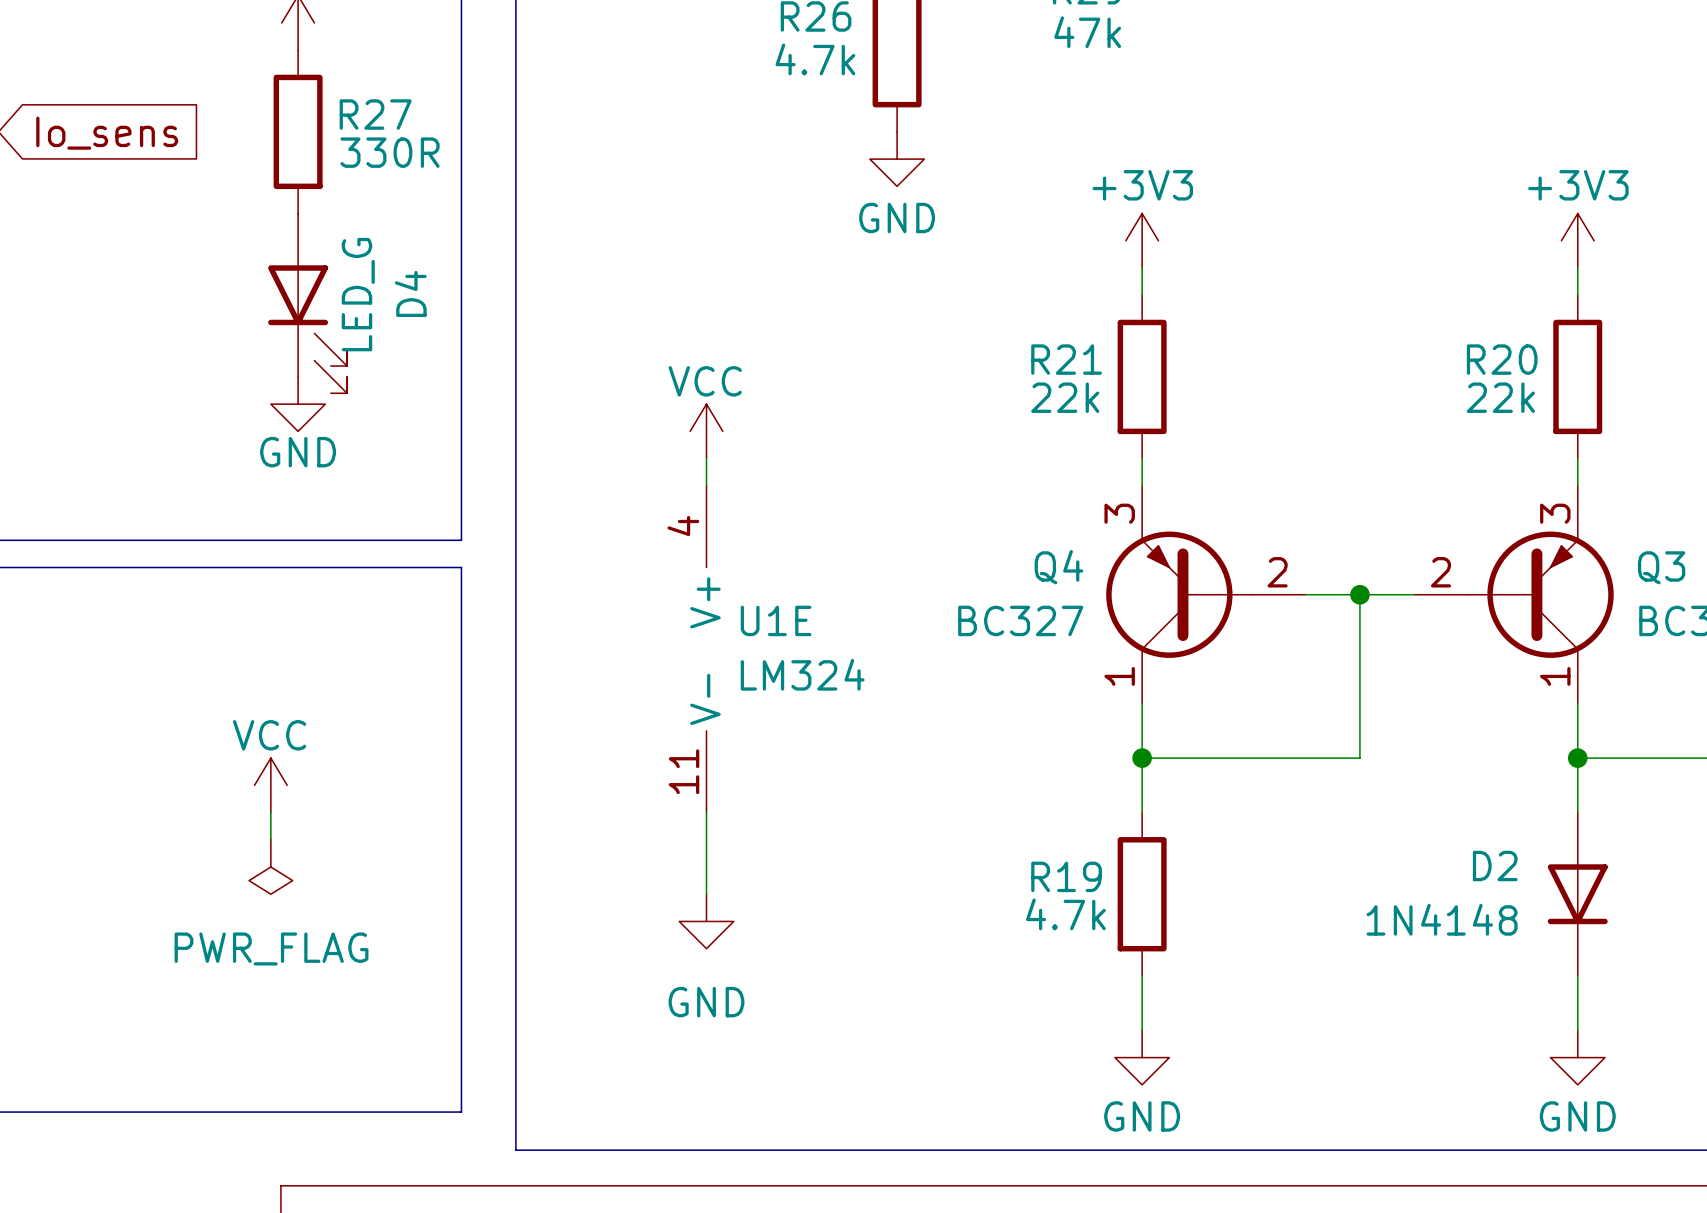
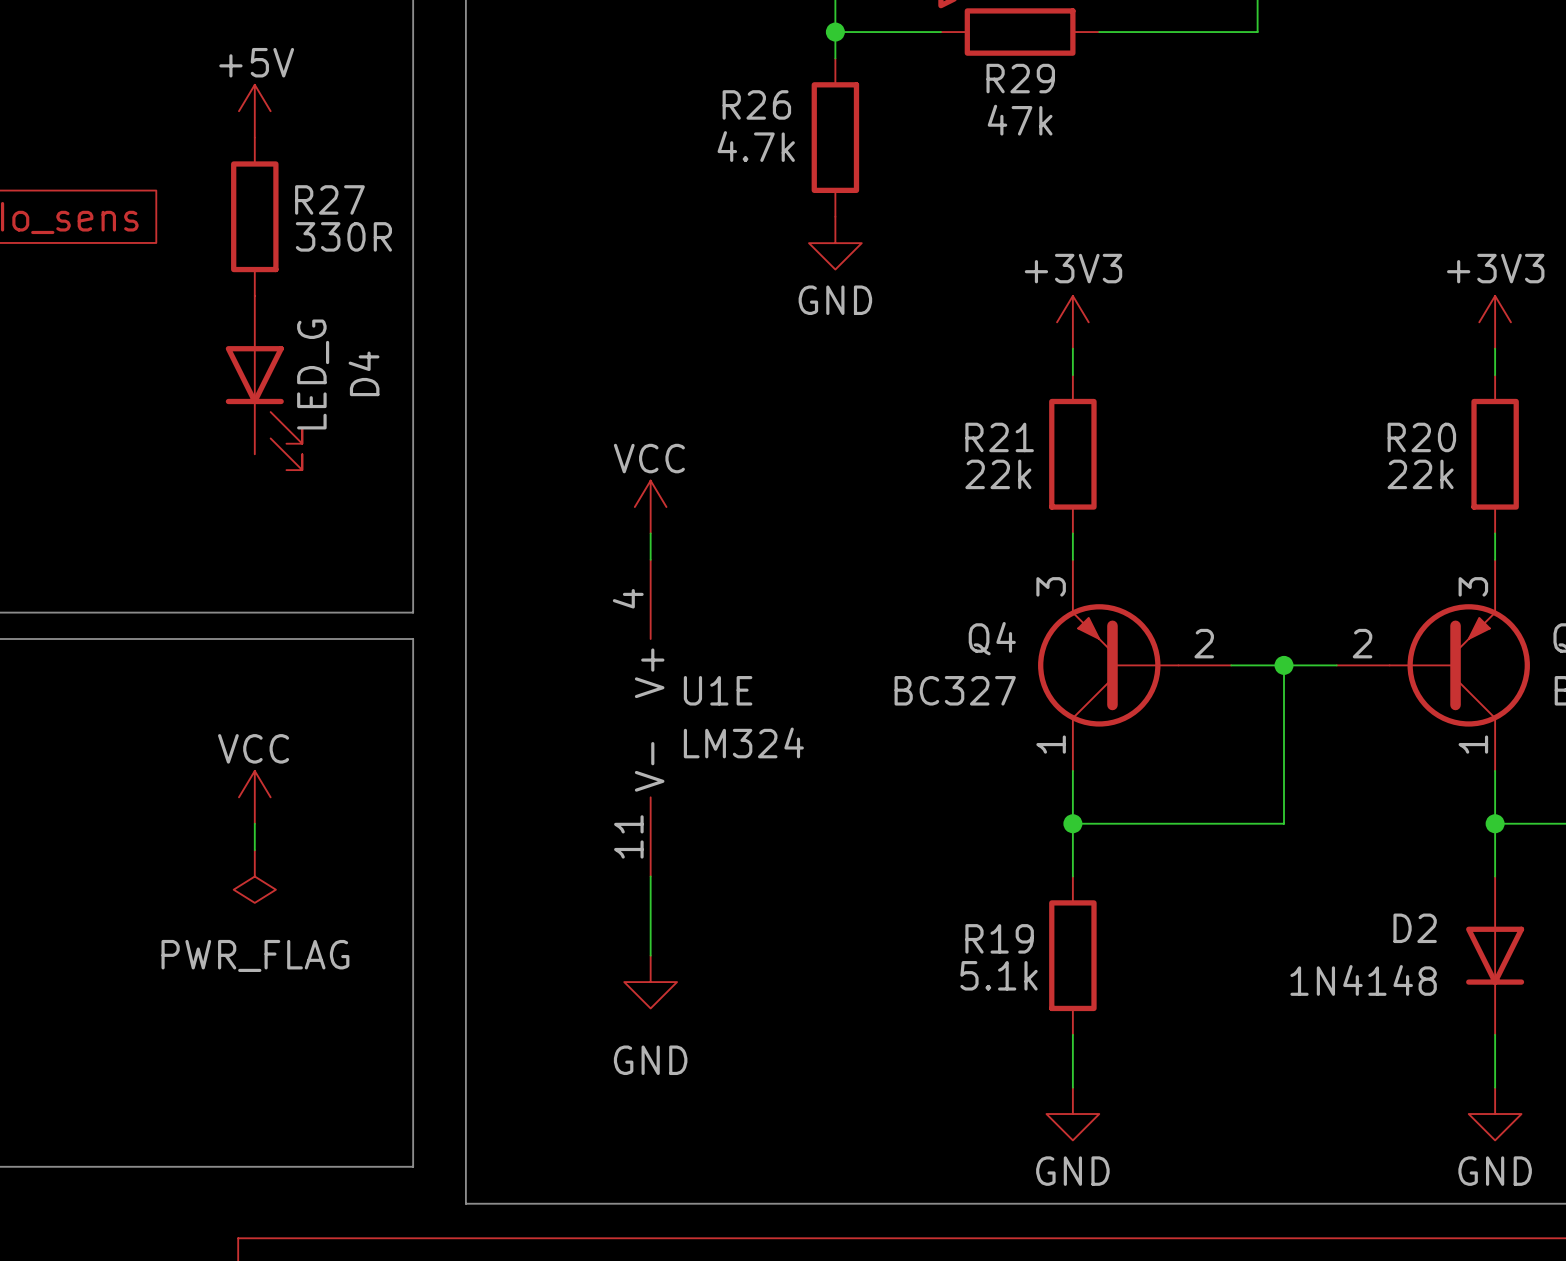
power symbol: GND (298, 404) -> none
power symbol position: VCC (270, 785) -> VCC (254, 797)
wire: (270, 812) (270, 839) -> (254, 823) (254, 850)
power symbol position: PWR_FLAG (270, 867) -> PWR_FLAG (254, 876)
R19 value: 4.7k (1065, 914) -> 5.1k (998, 975)

